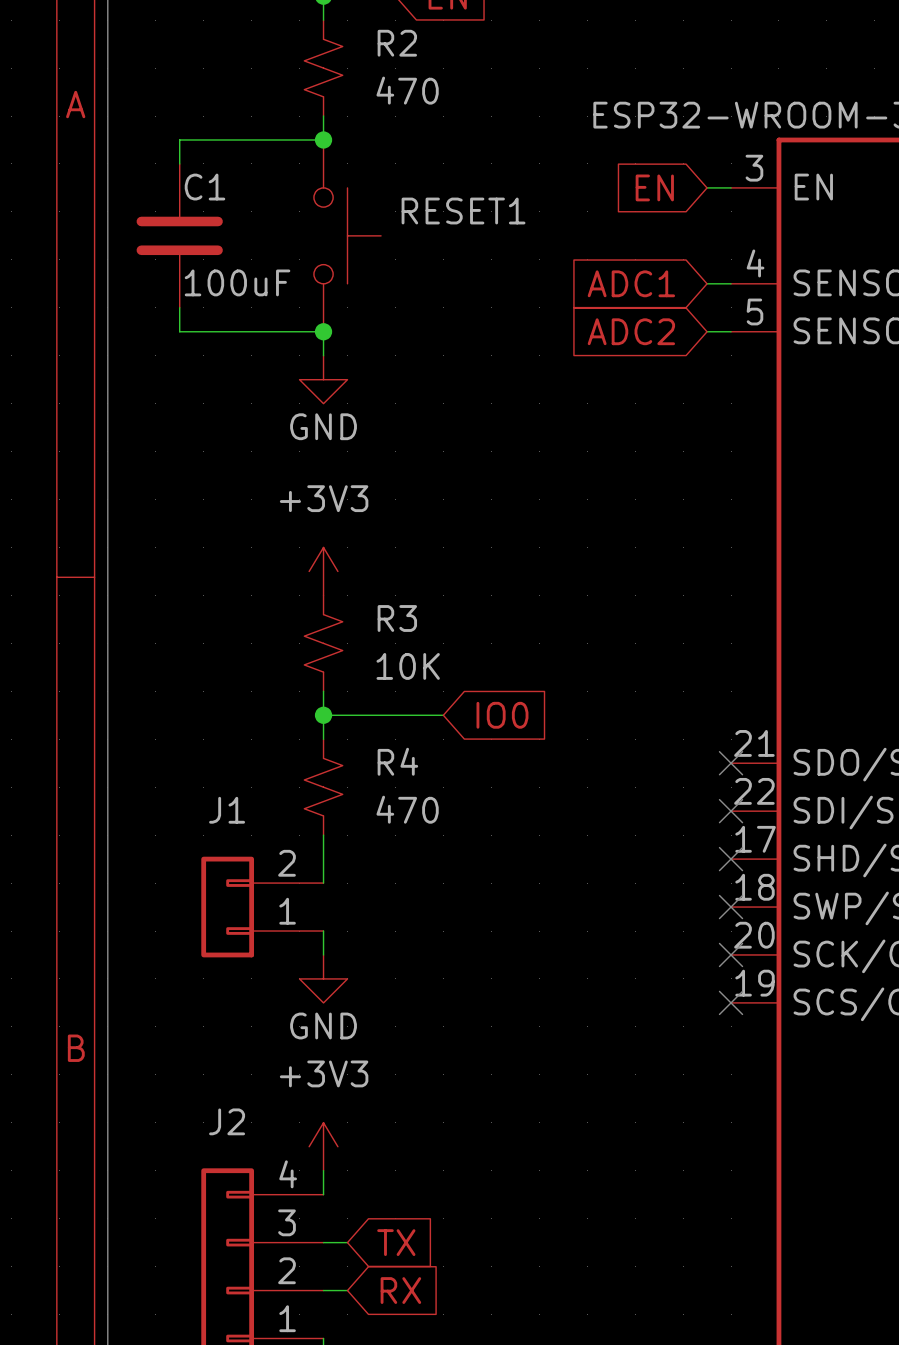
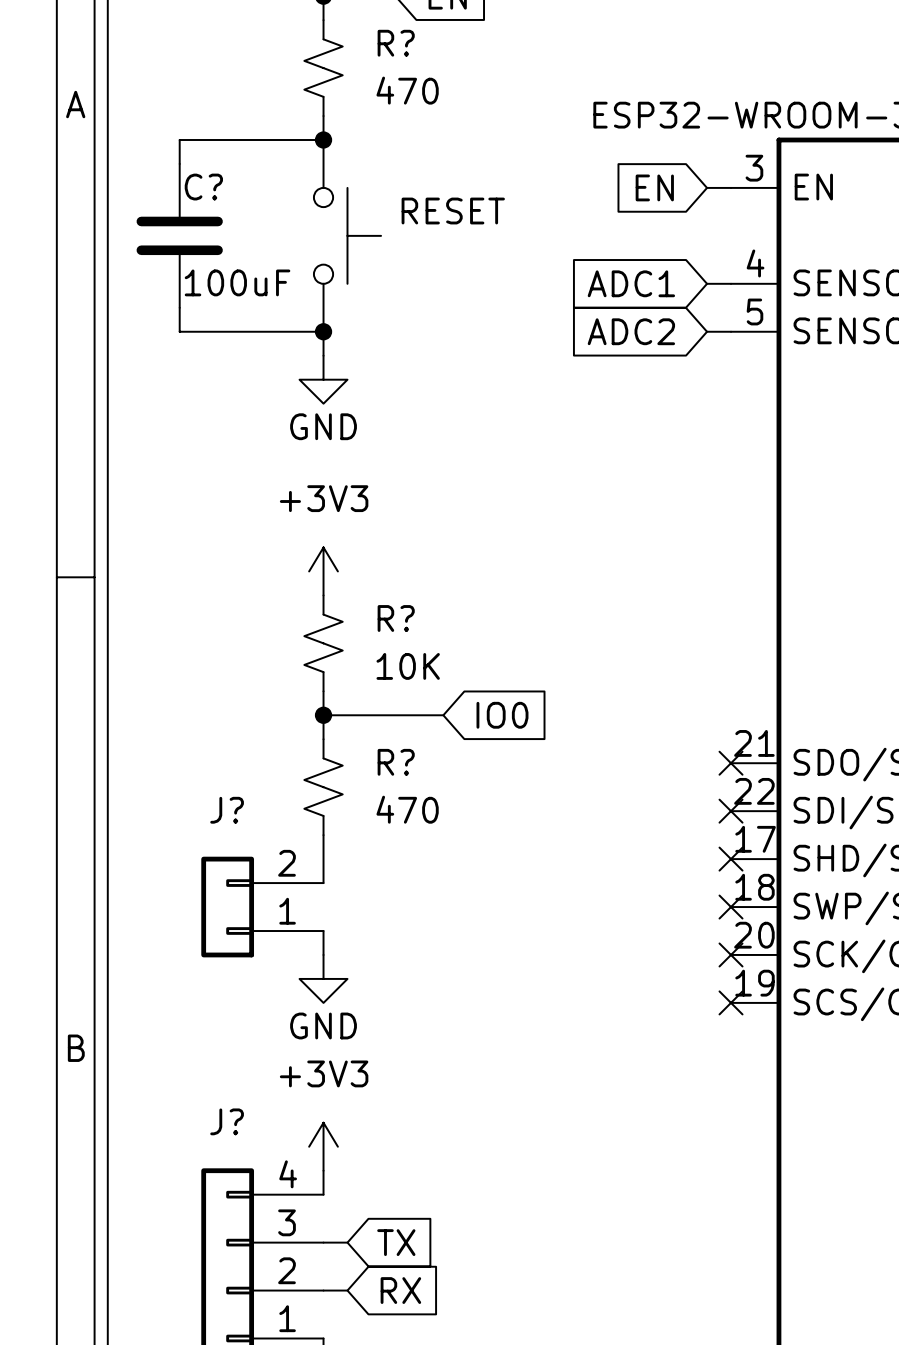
R2 name: R2 (397, 43) -> R? (396, 43)
C1 name: C1 (205, 187) -> C? (203, 187)
RESET1 name: RESET1 (463, 211) -> RESET (453, 211)
R3 name: R3 (397, 618) -> R? (396, 618)
R4 name: R4 (397, 761) -> R? (396, 762)
J1 name: J1 (227, 810) -> J? (227, 810)
J2 name: J2 (227, 1121) -> J? (227, 1121)

